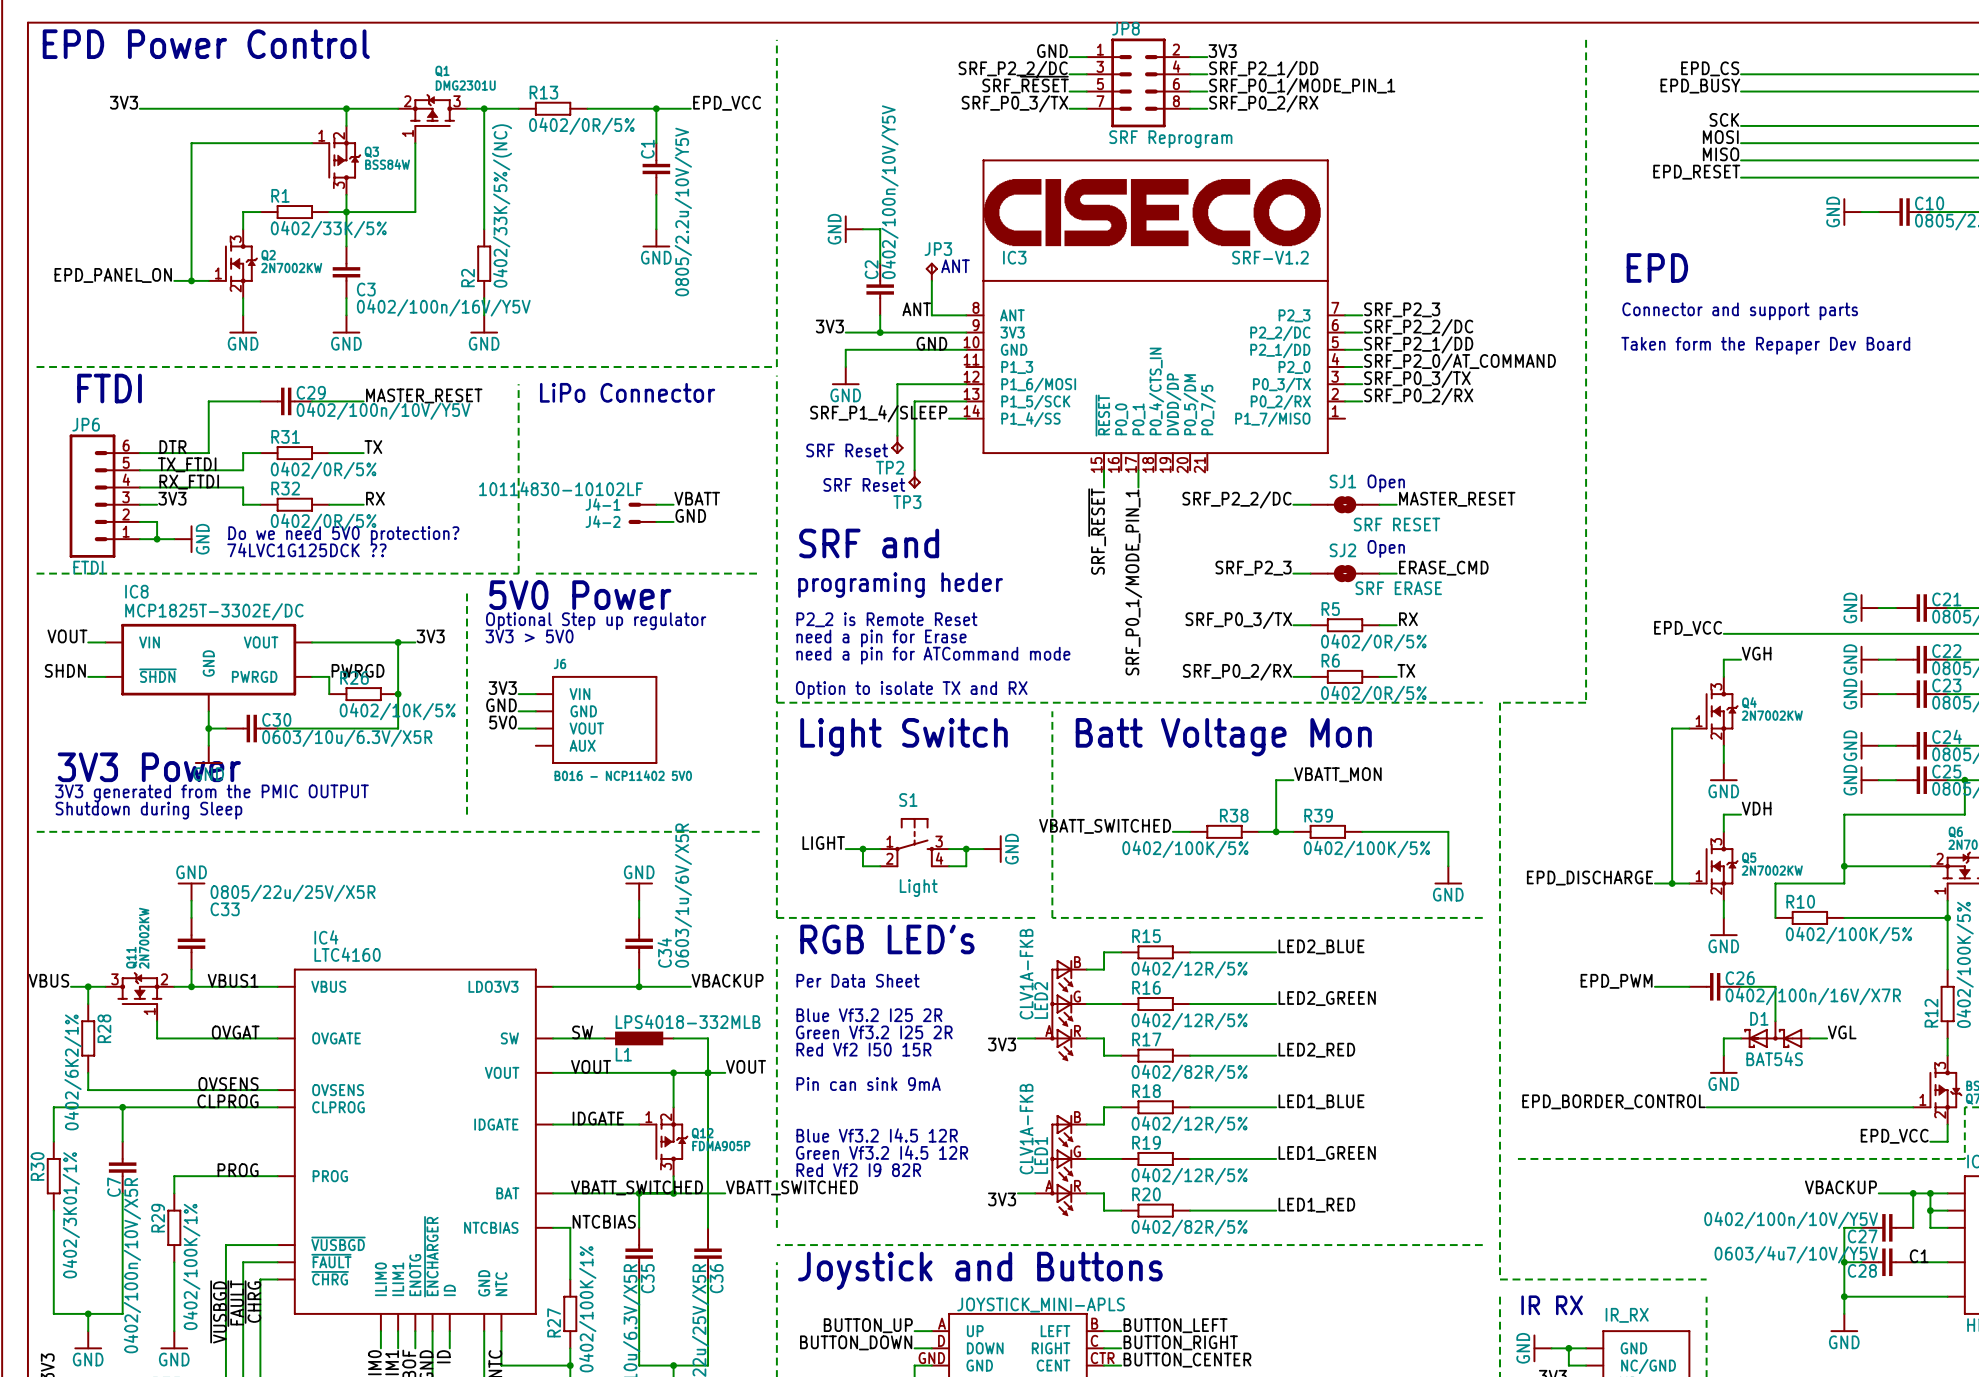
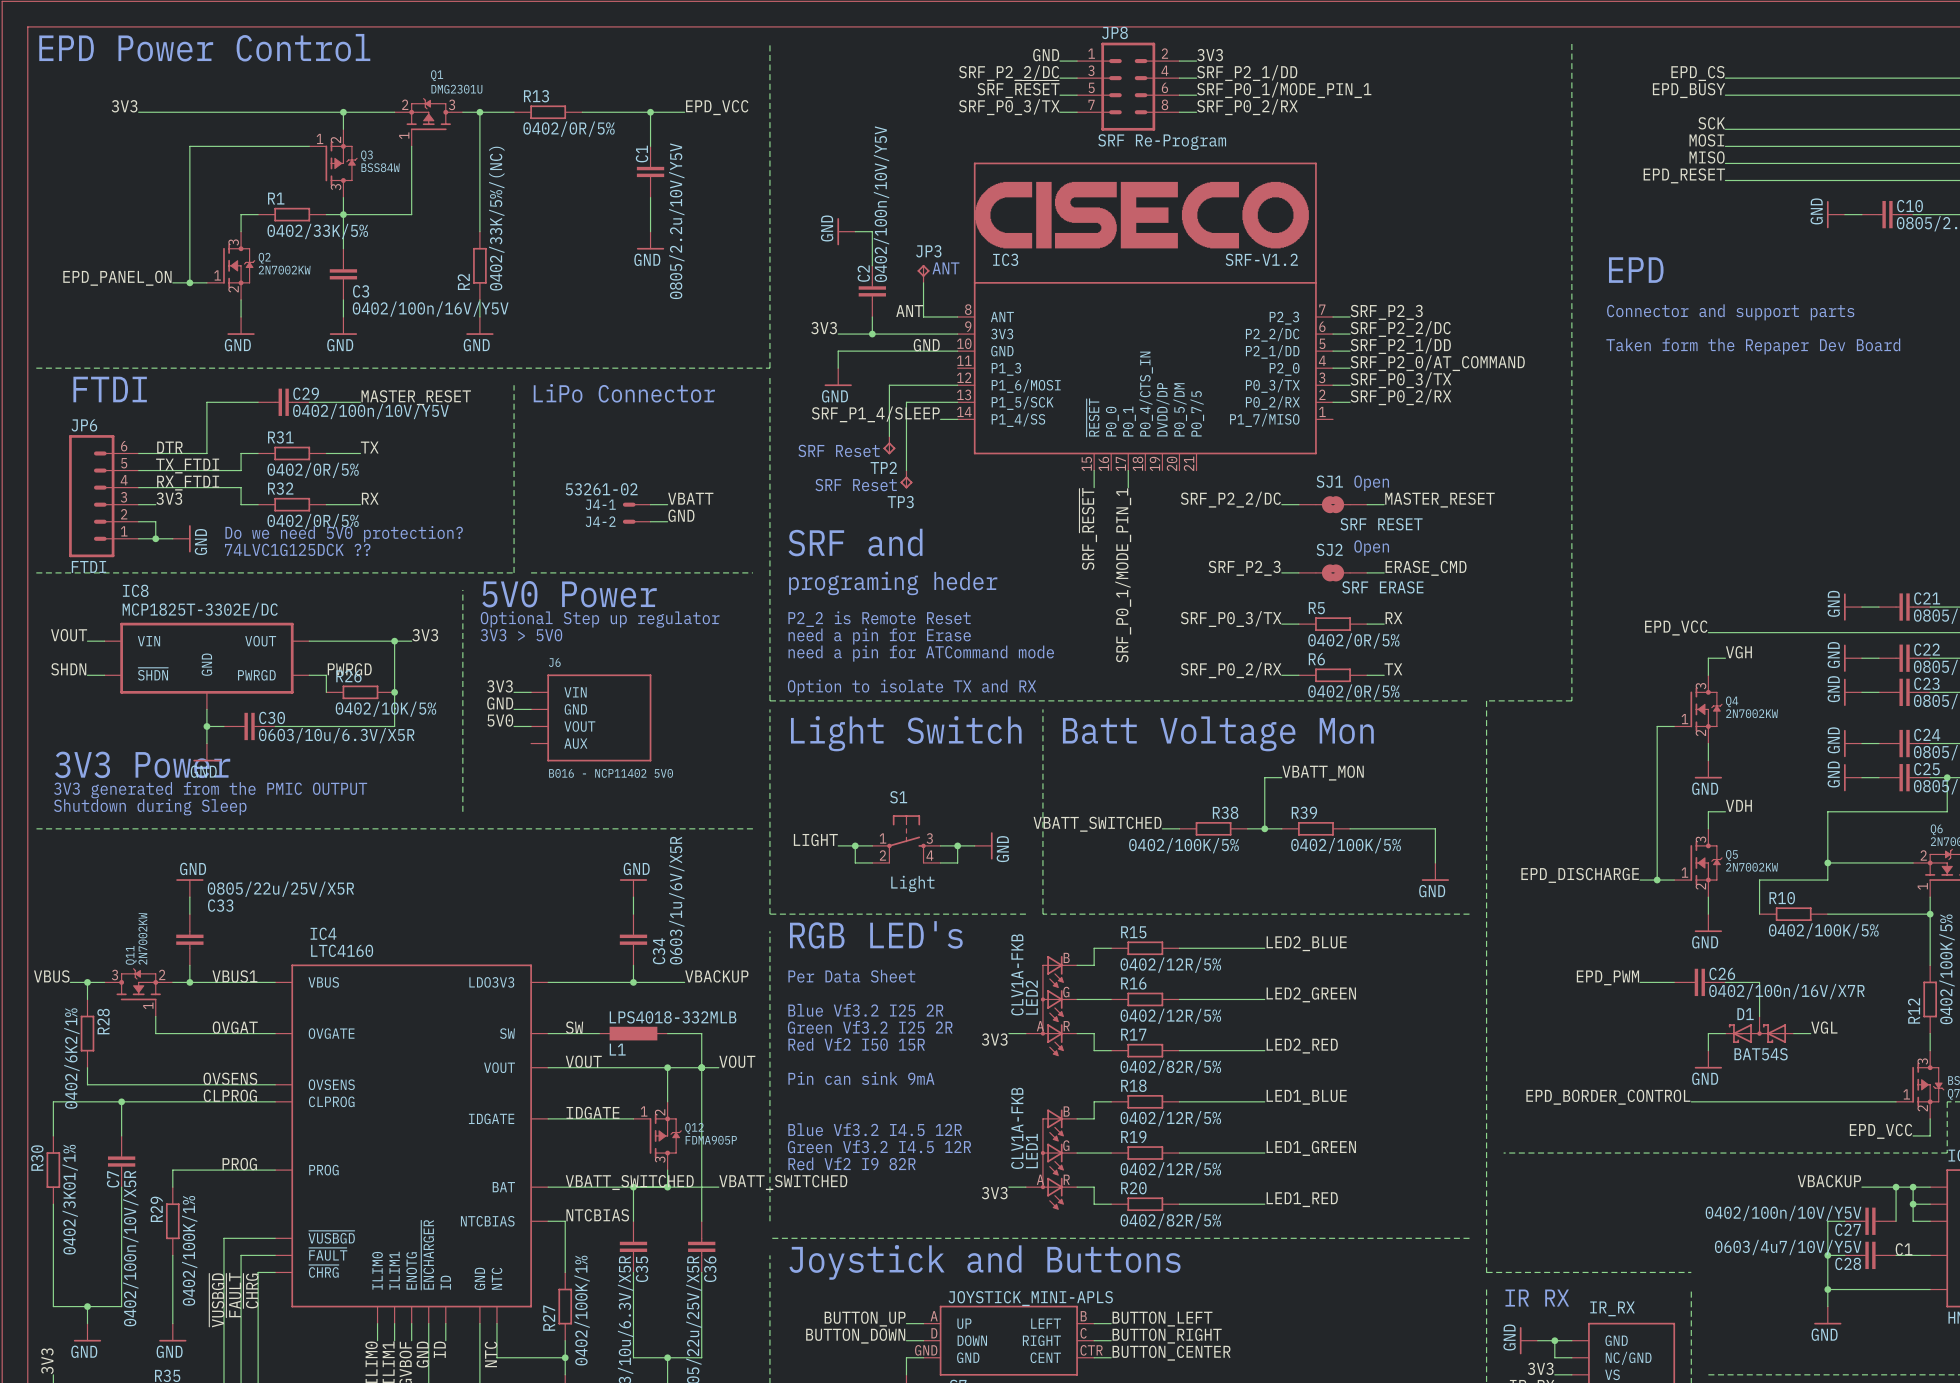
JP8 value: SRF Reprogram (1170, 139) -> SRF Re-Program (1162, 142)
J4-1 value: 10114830-10102LF (561, 488) -> 53261-02 (601, 489)

